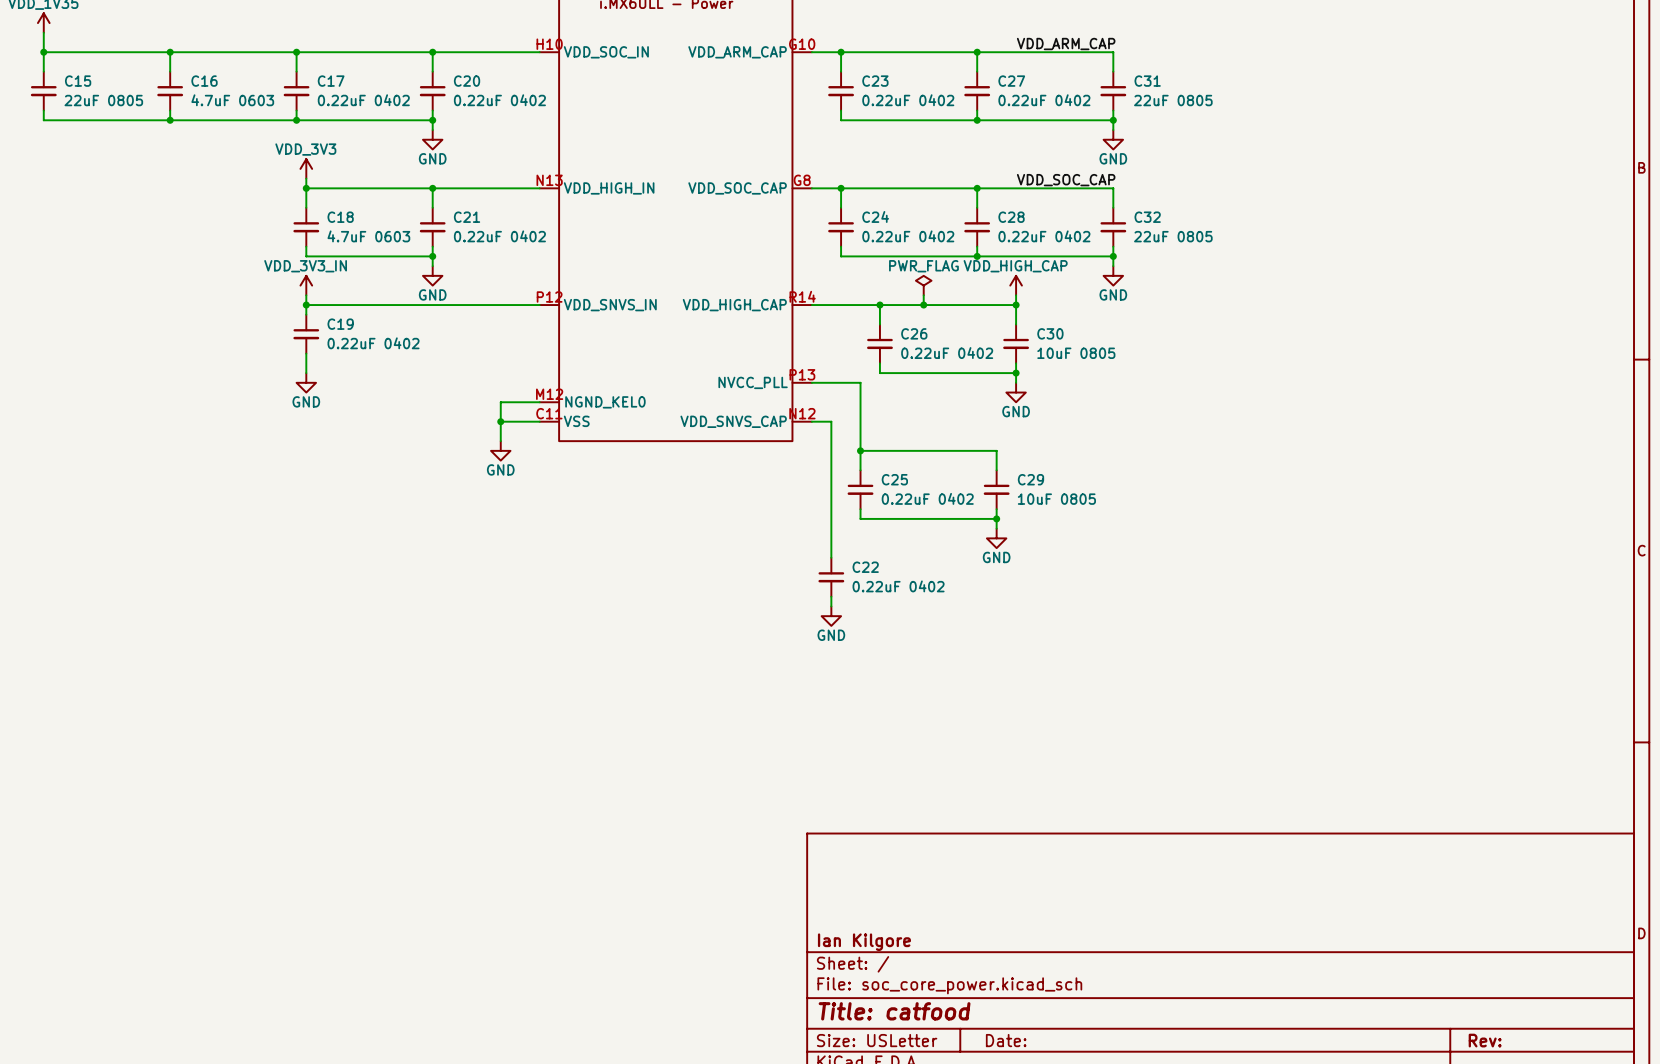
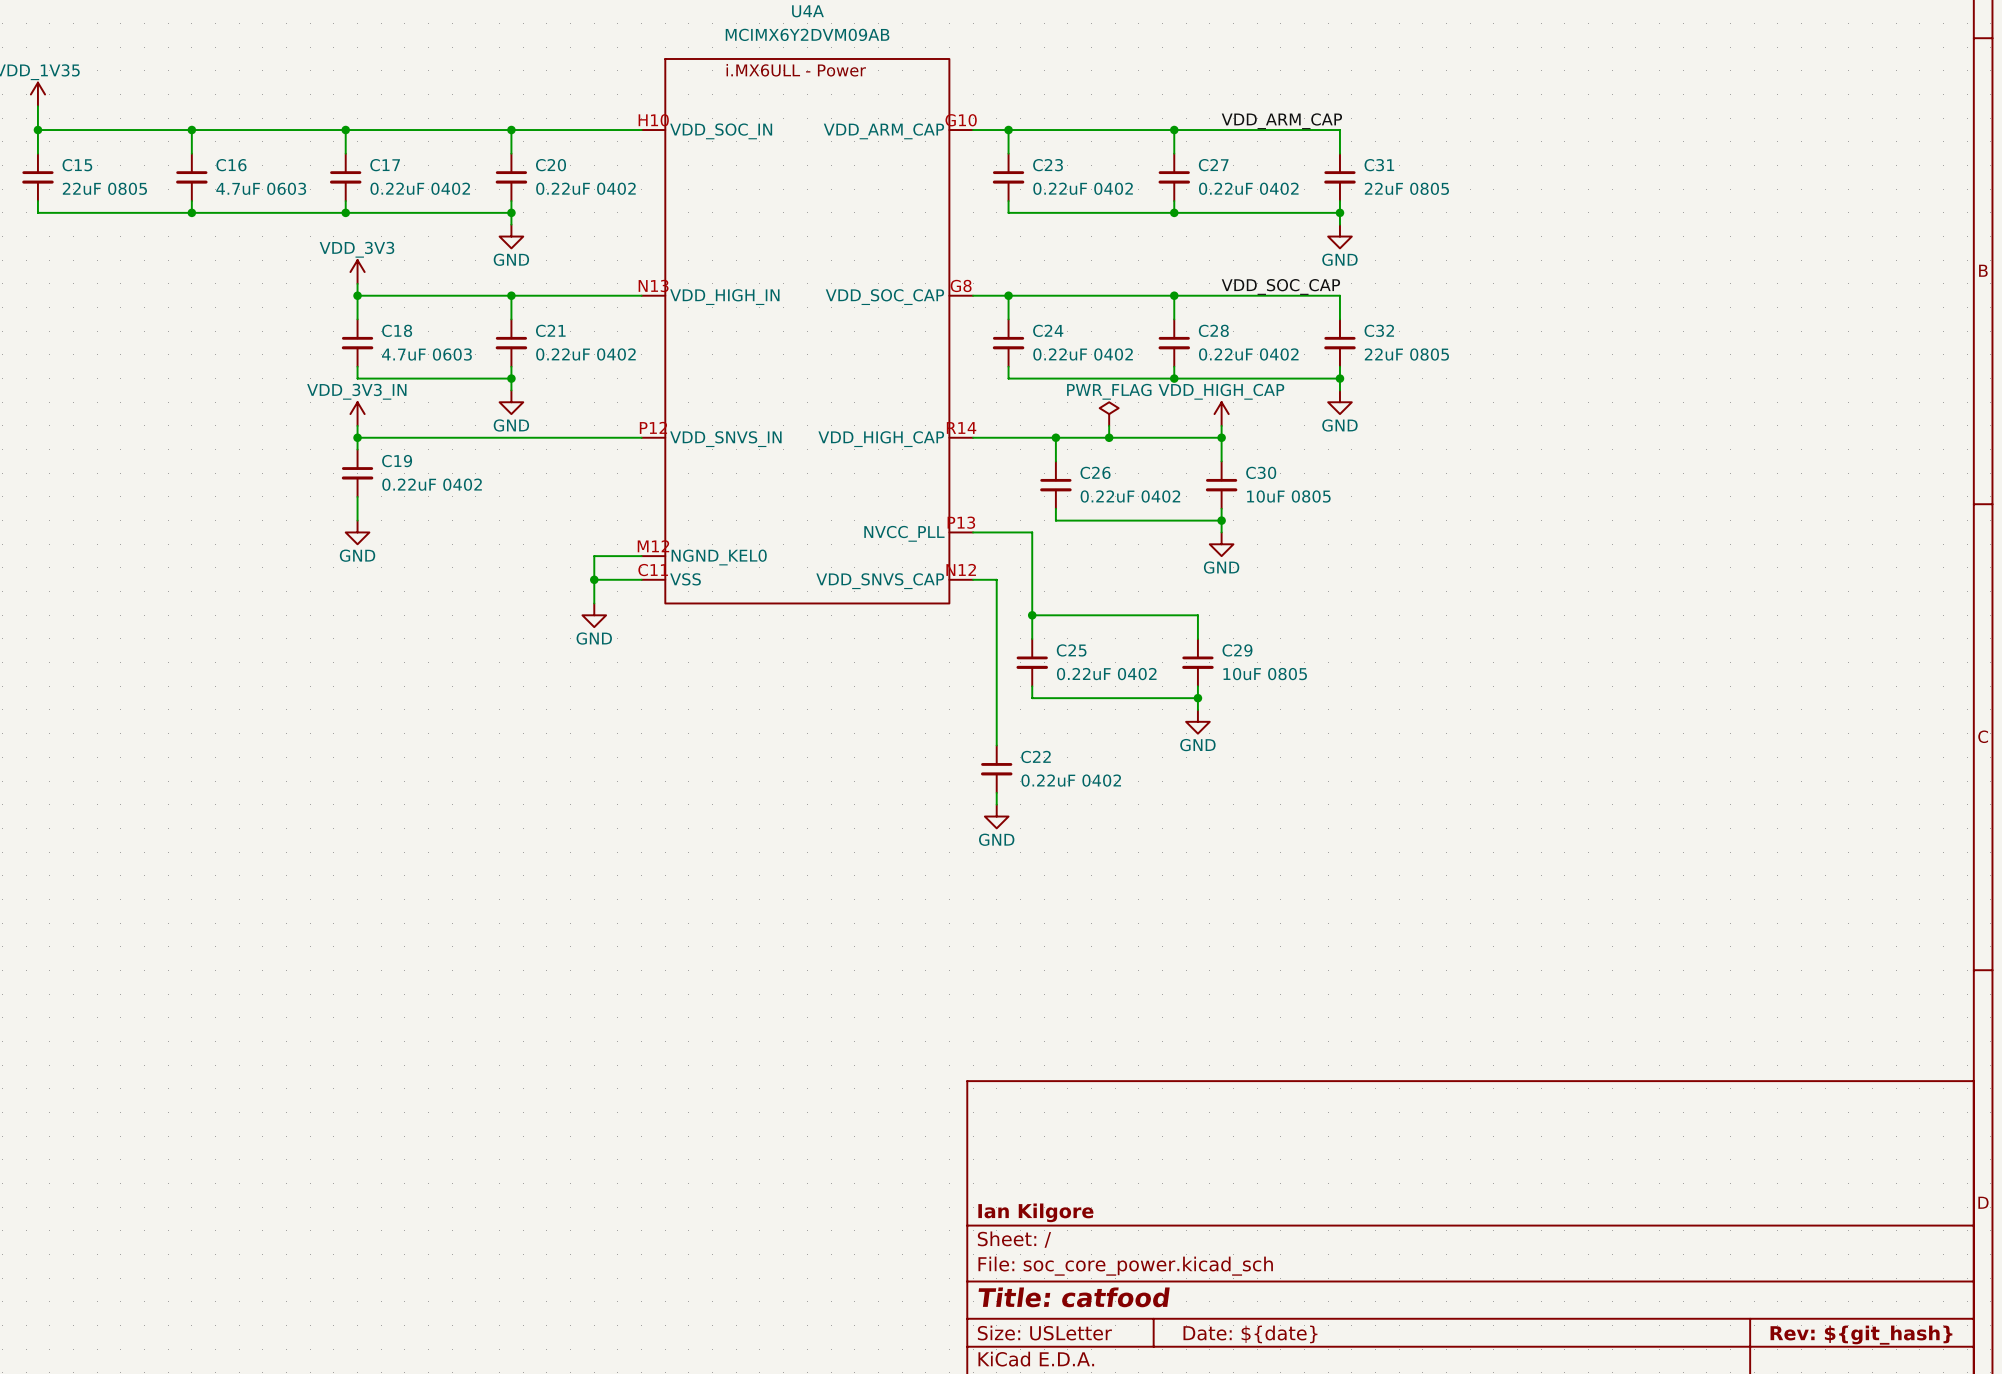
title block: Date: (1006, 1040) -> Date: ${date} (1250, 1334)
title block: Rev: (1485, 1040) -> Rev: ${git_hash} (1861, 1335)

